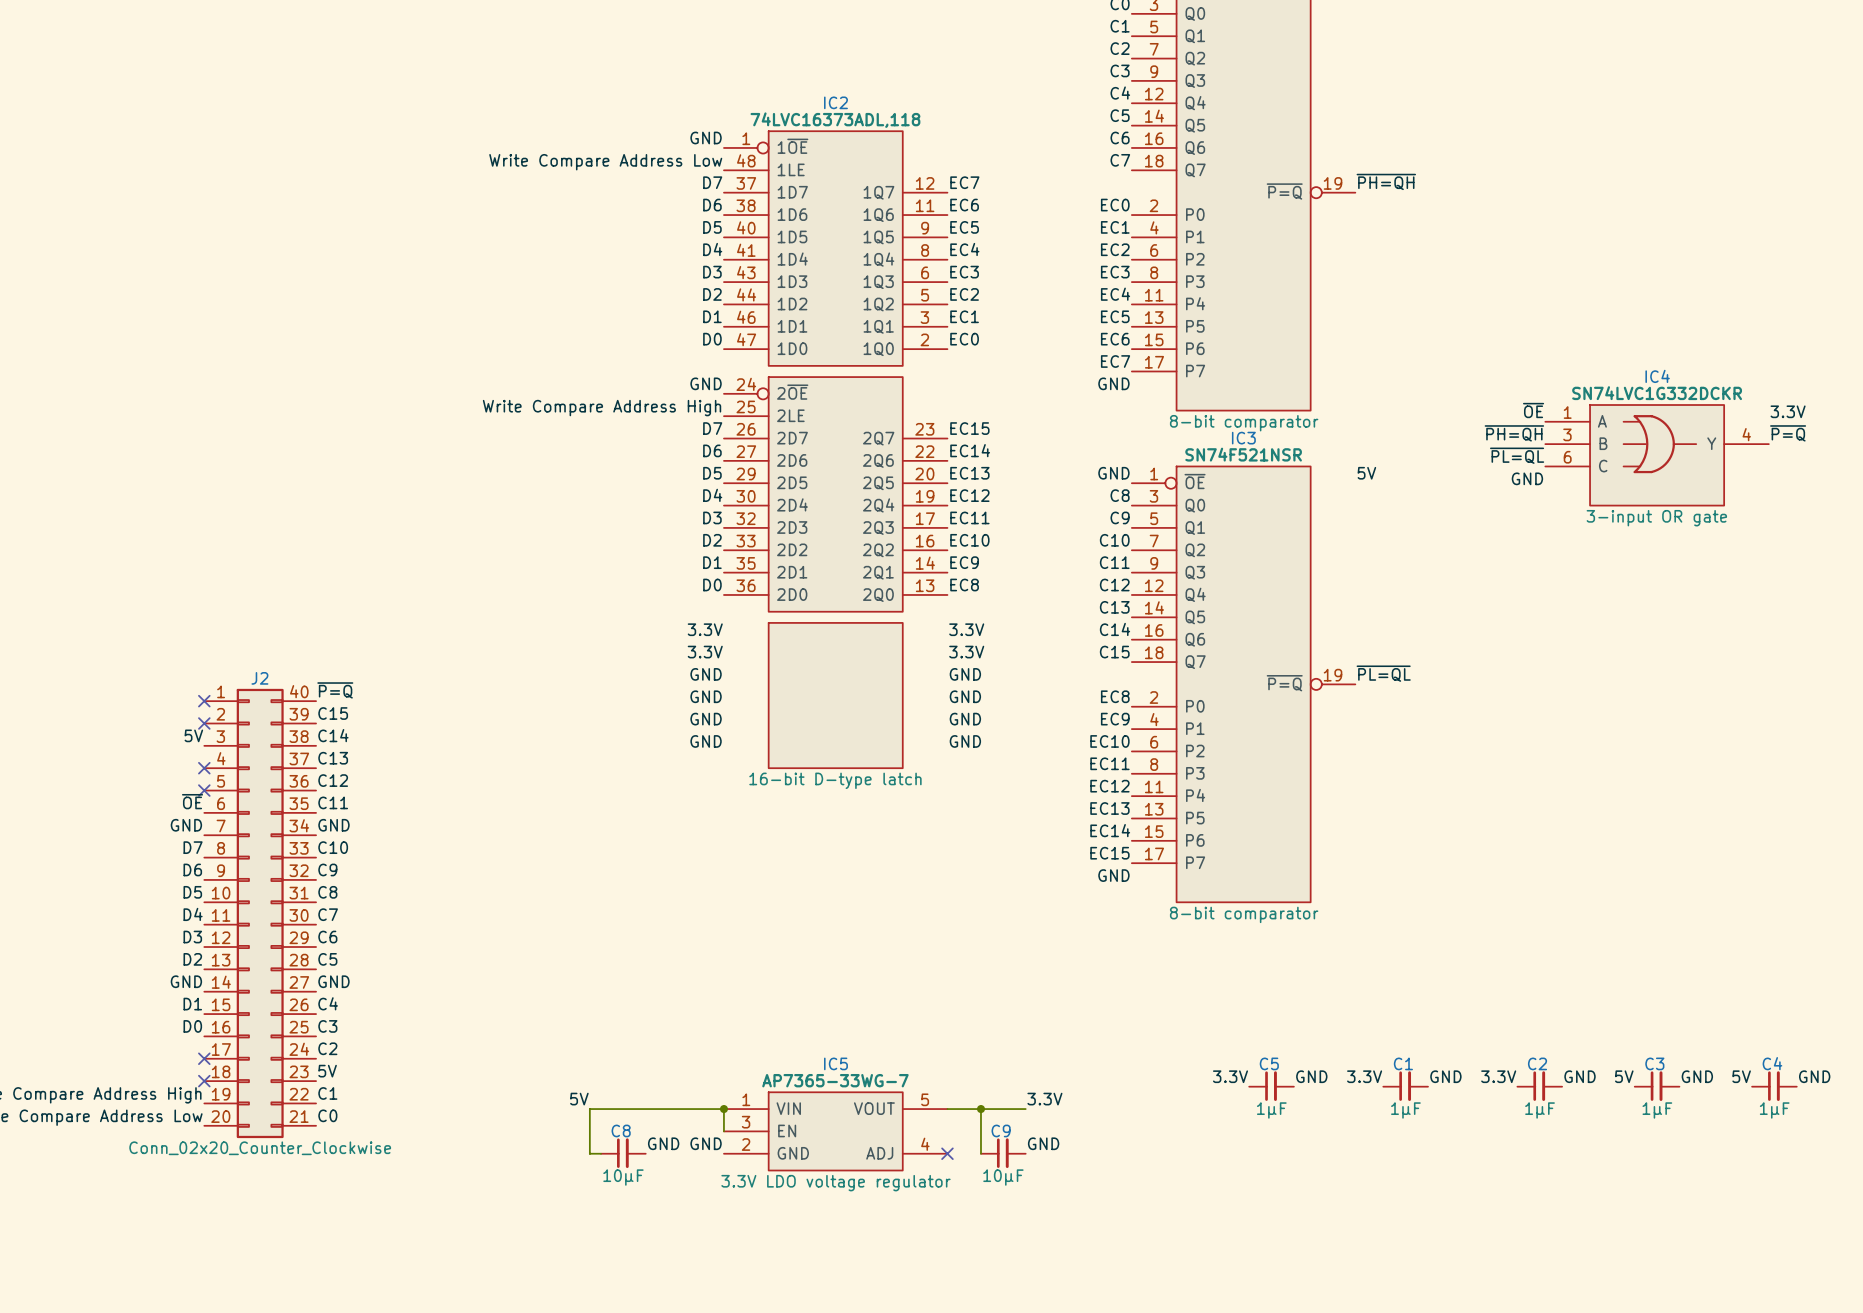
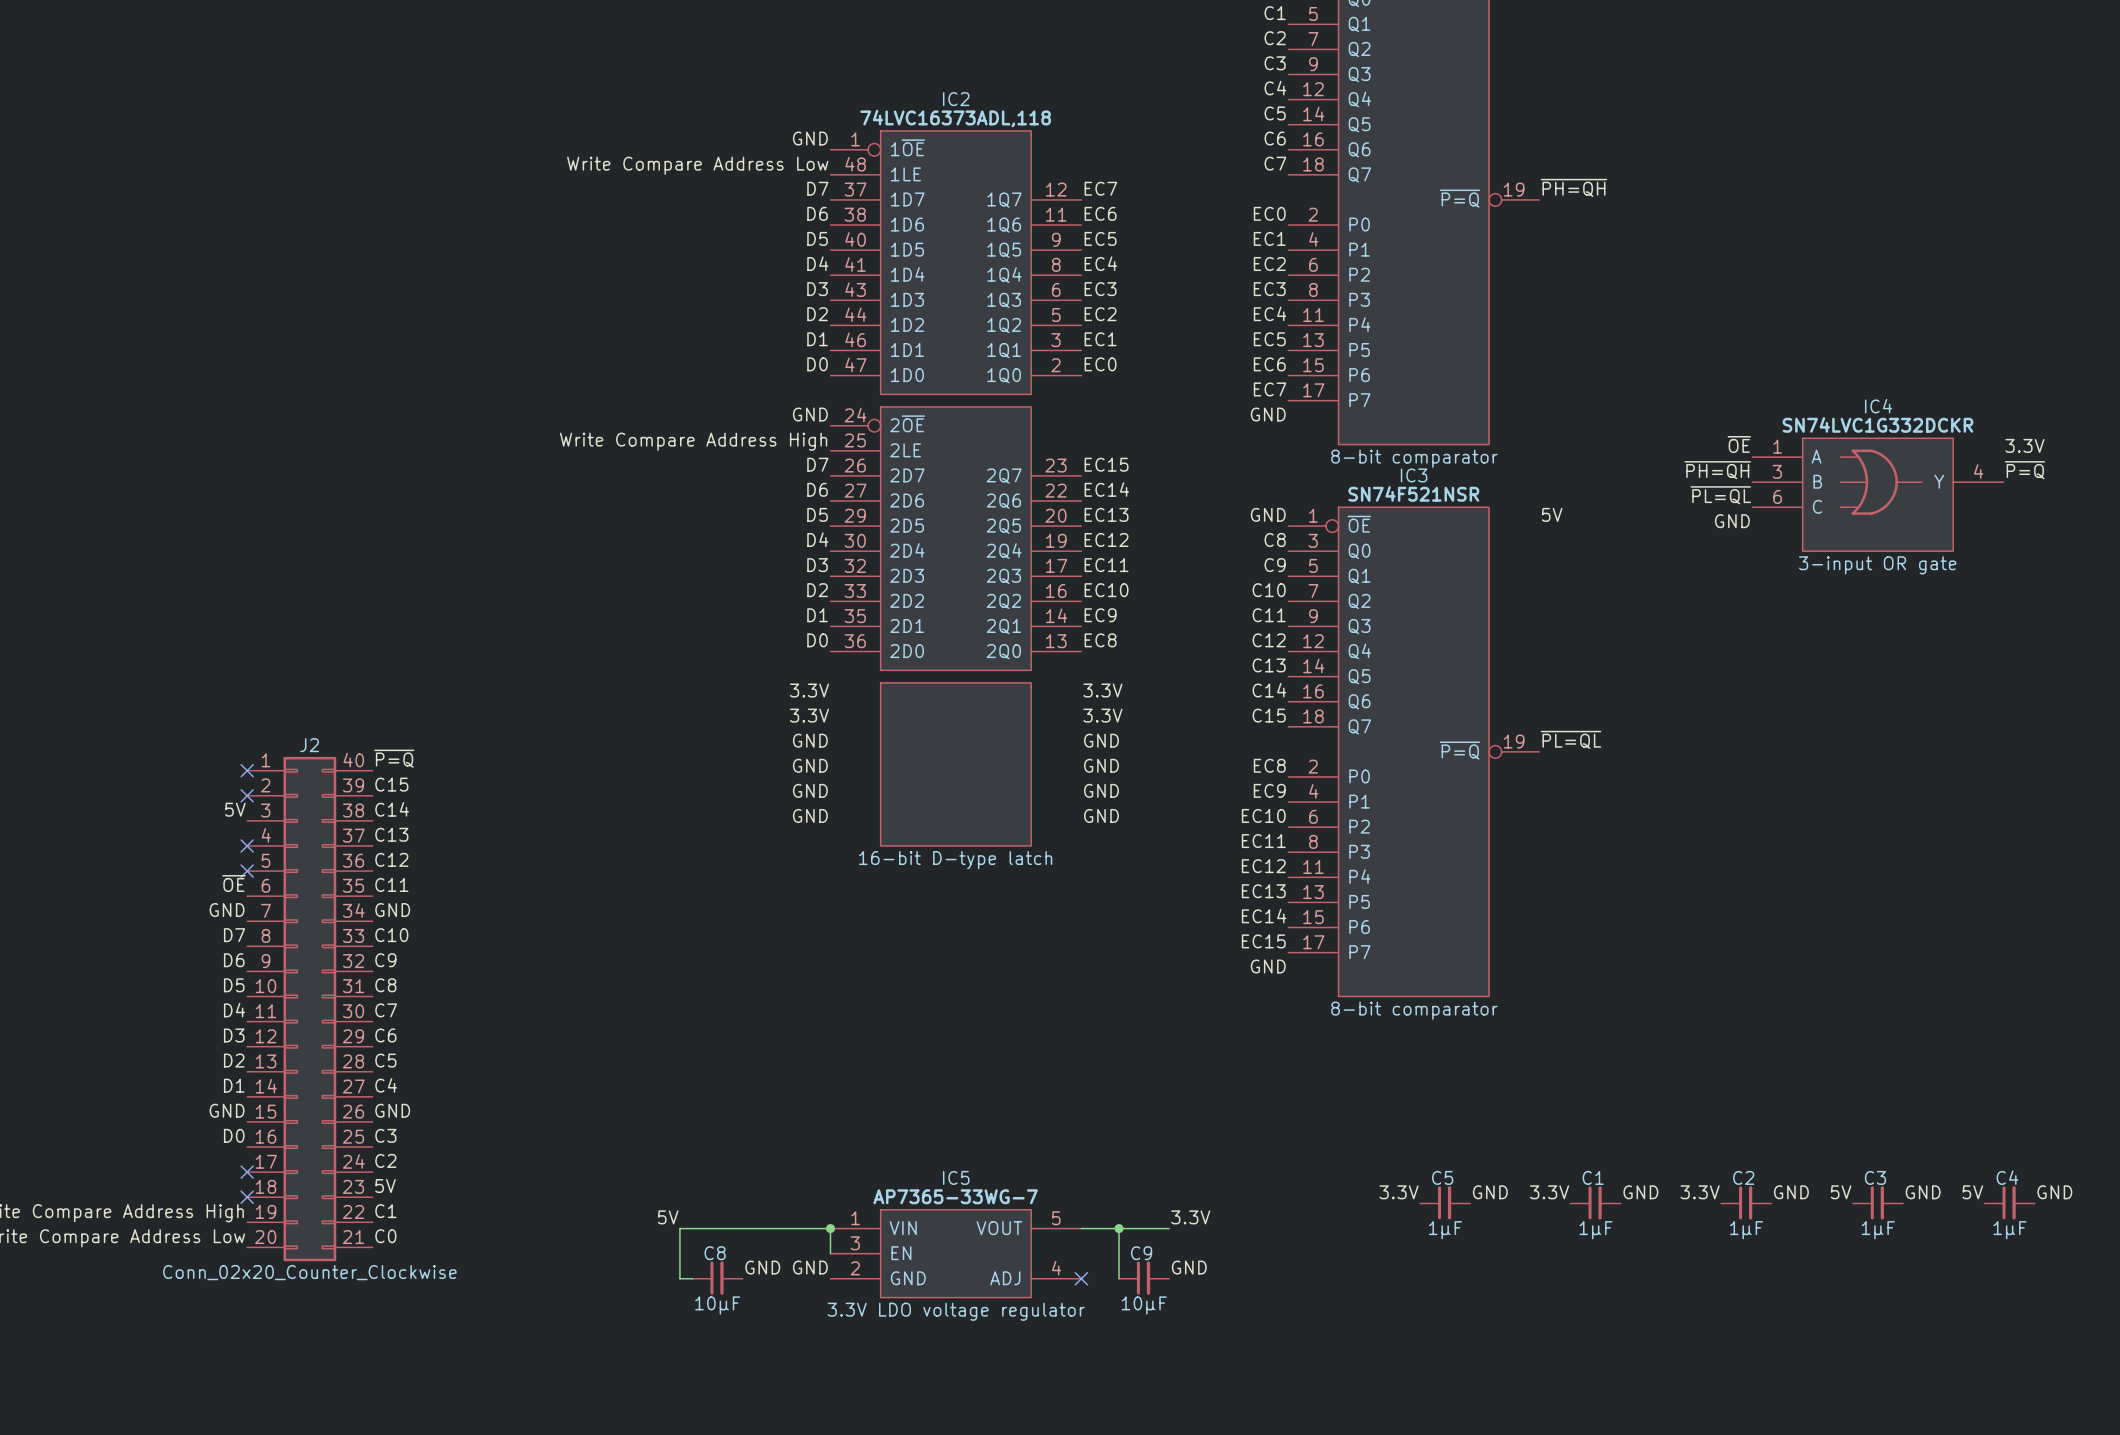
label: GND (186, 981) -> D1 (234, 1085)
label: GND (333, 981) -> C4 (386, 1085)
label: C4 (328, 1003) -> GND (392, 1110)
label: D1 (192, 1004) -> GND (227, 1110)

